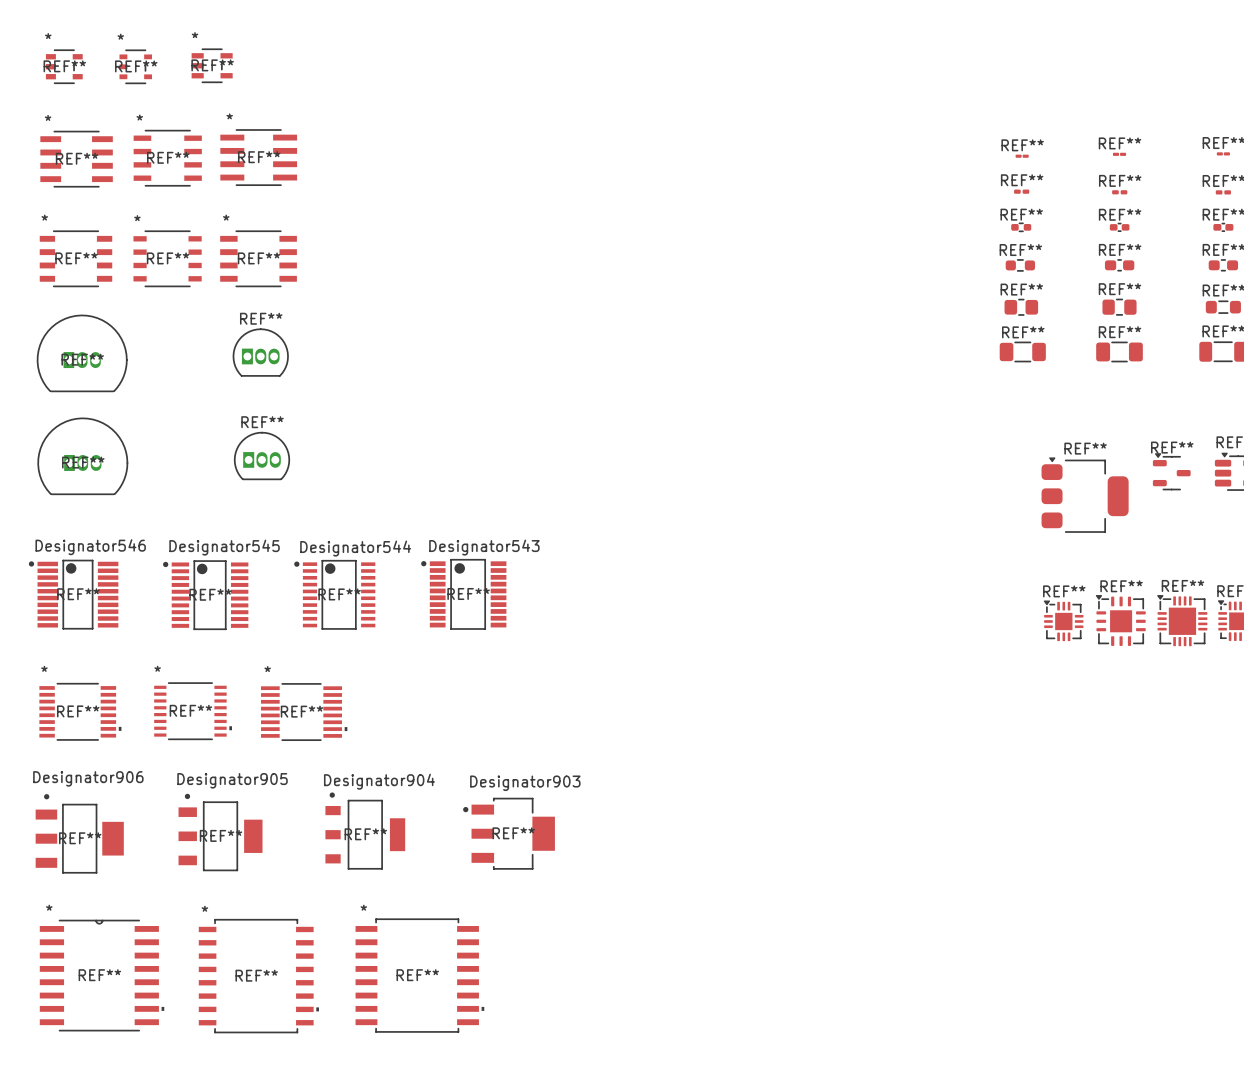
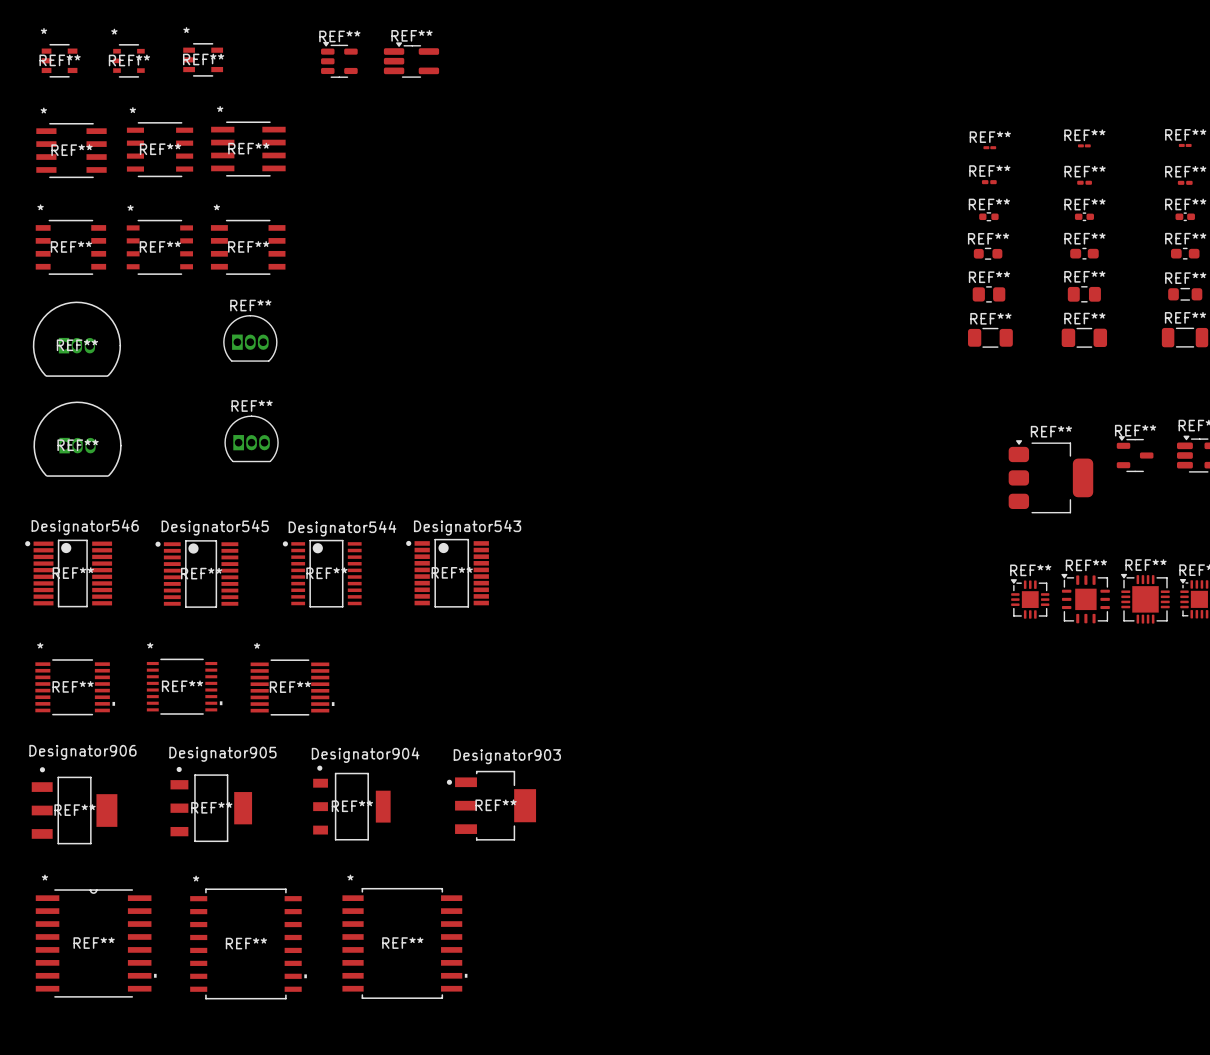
REF**: none -> (339, 59)
REF**: none -> (411, 60)

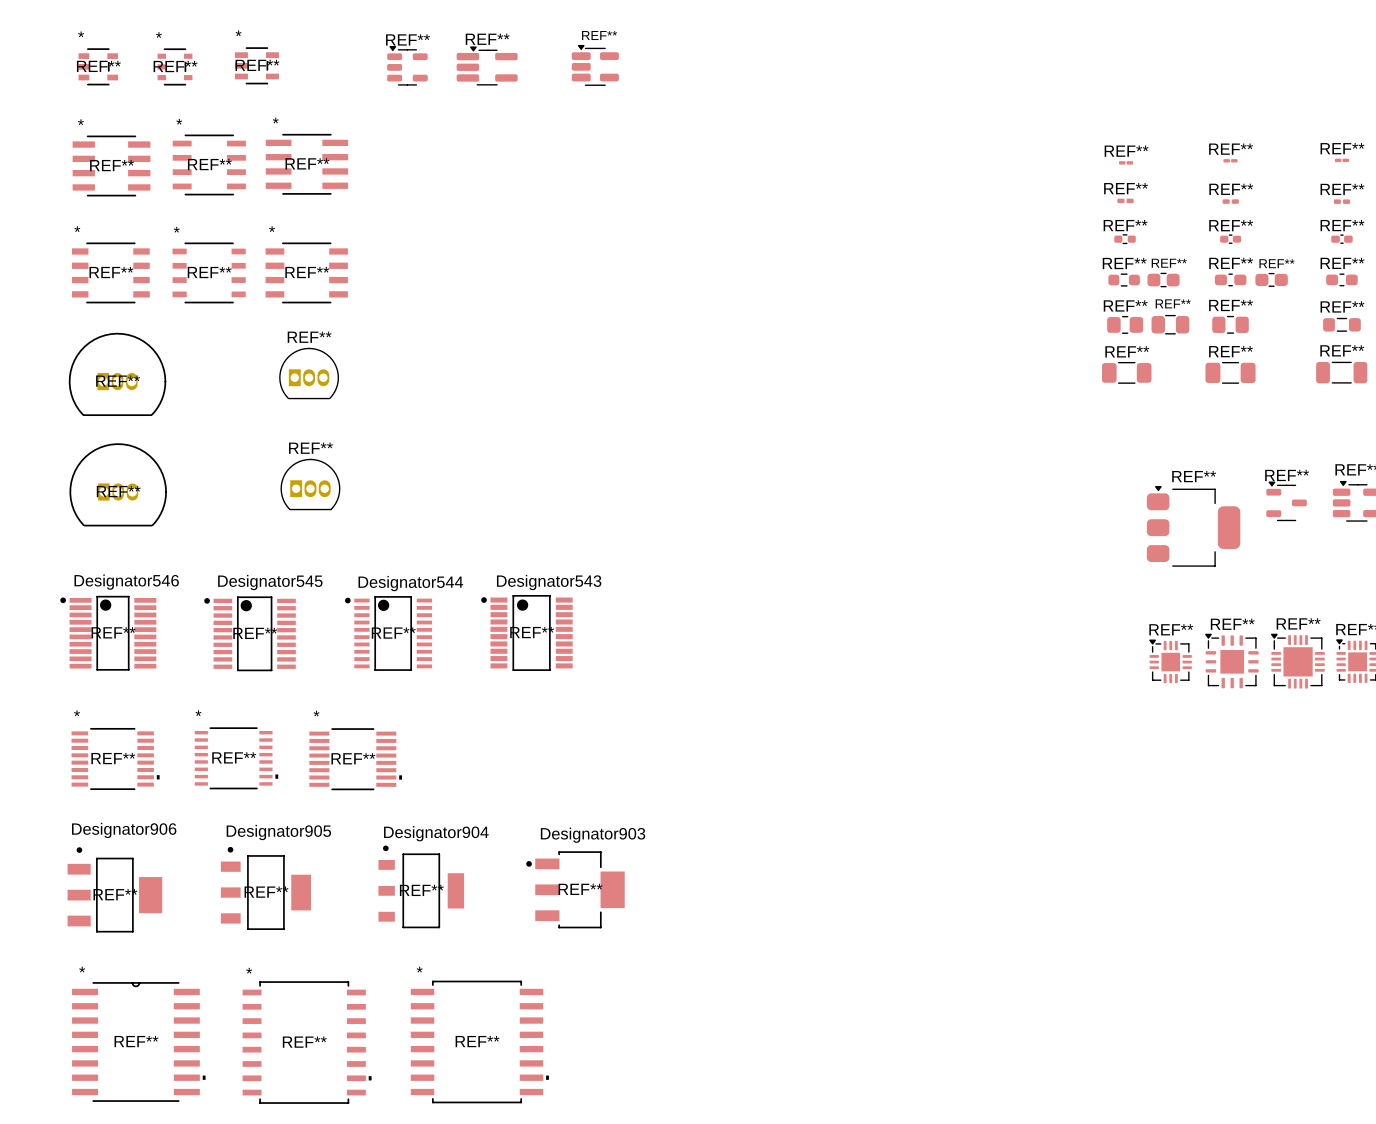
REF**: none -> (595, 65)
REF**: none -> (1163, 280)
REF**: none -> (1271, 279)
REF**: none -> (1170, 324)

